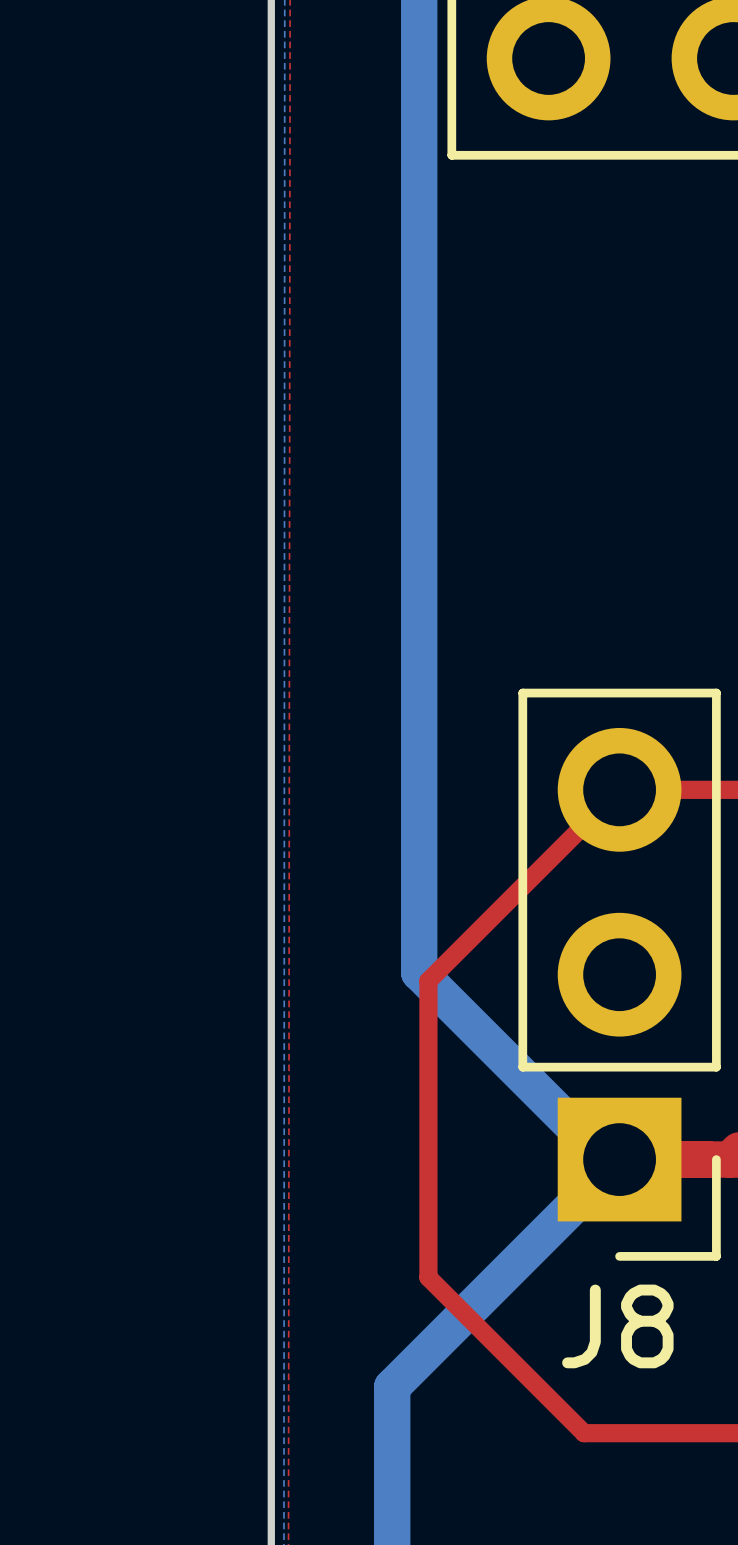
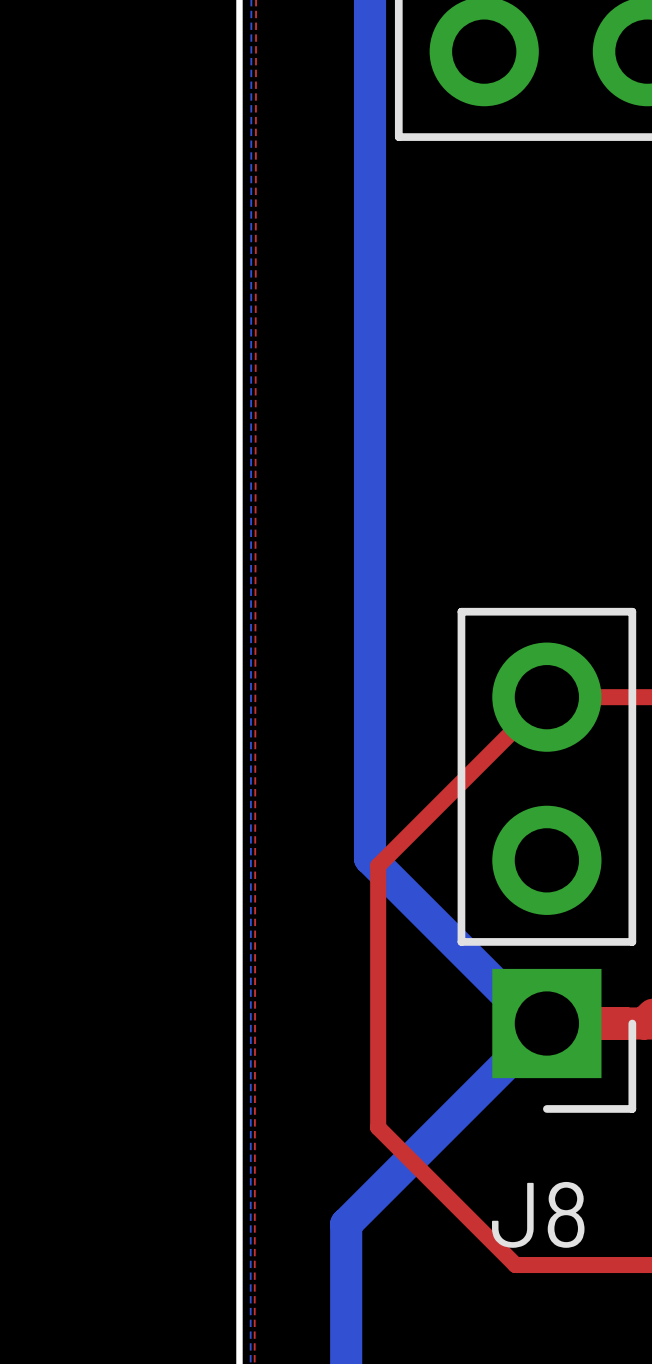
J8 name position: J8 (617, 1326) -> J8 (538, 1214)

